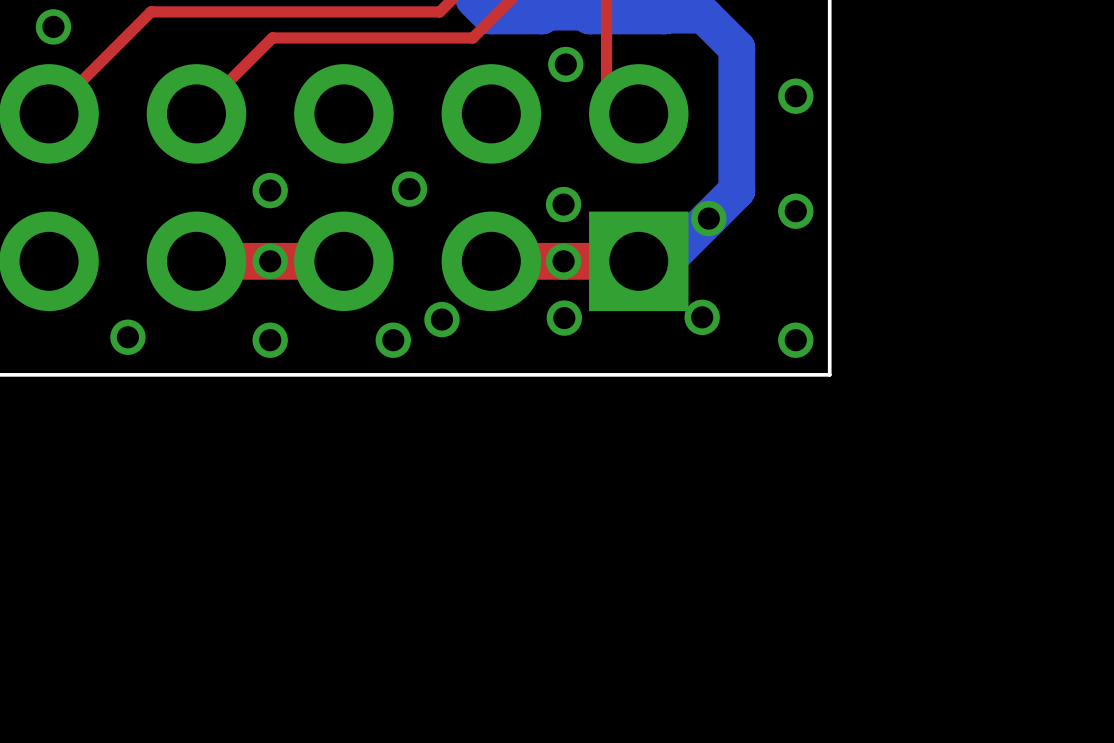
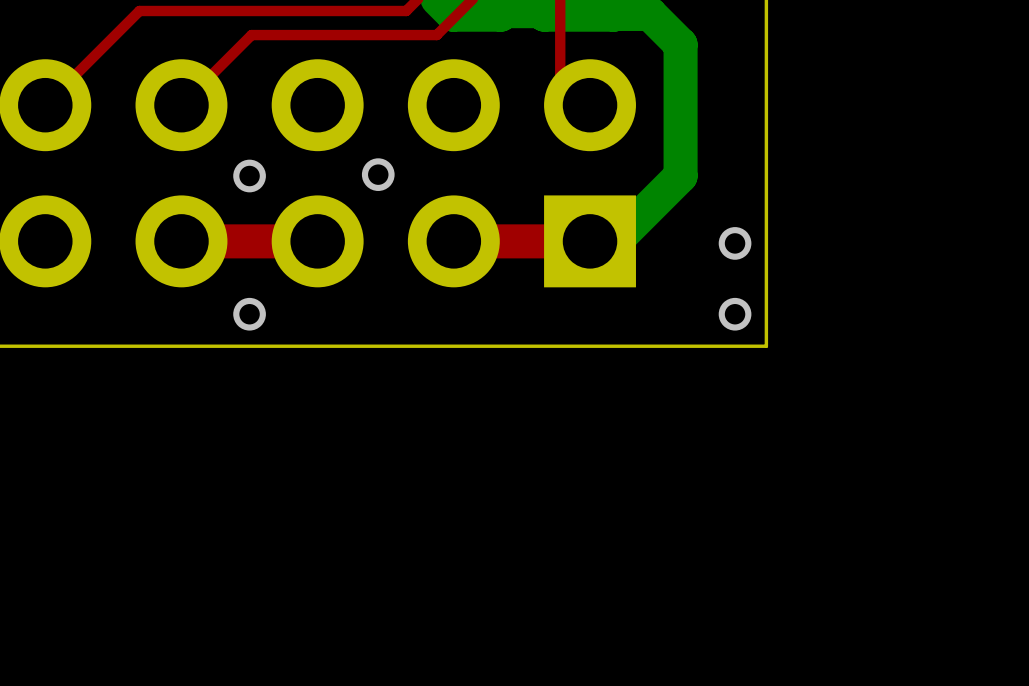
via: (53, 26) -> none
via: (565, 64) -> none
via: (795, 96) -> none
via: (563, 204) -> none
via: (795, 211) -> none
via: (708, 218) -> none
via: (270, 261) -> none
via: (563, 261) -> none
via: none -> (735, 243)
via: (702, 317) -> none
via: (564, 318) -> none
via: (441, 319) -> none
via: (127, 337) -> none
via: (393, 340) -> none

